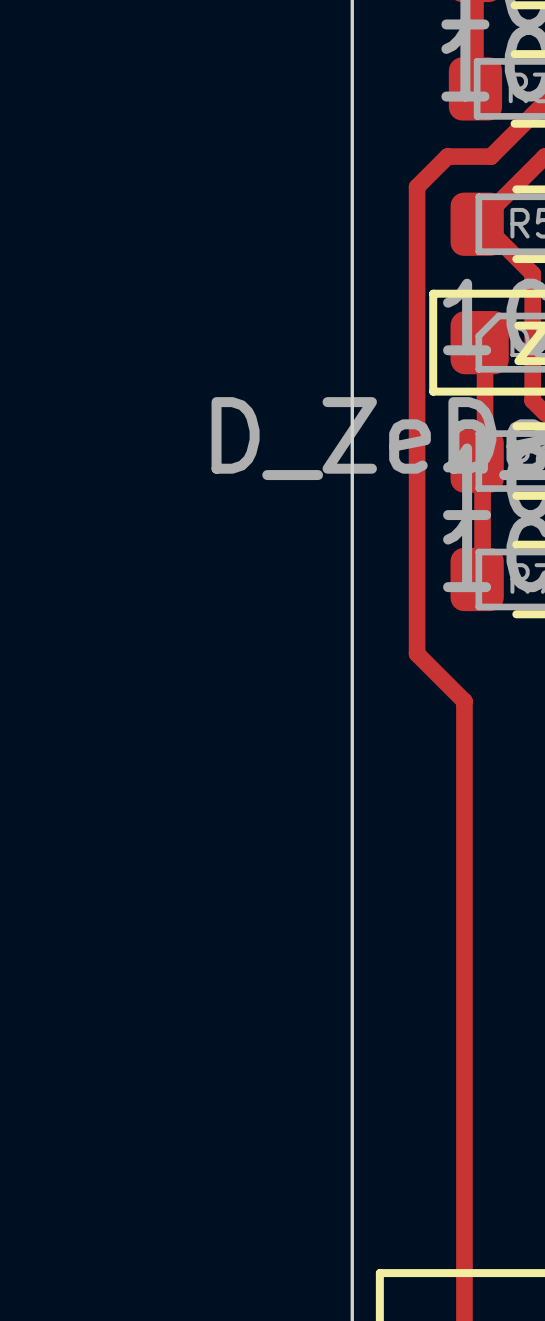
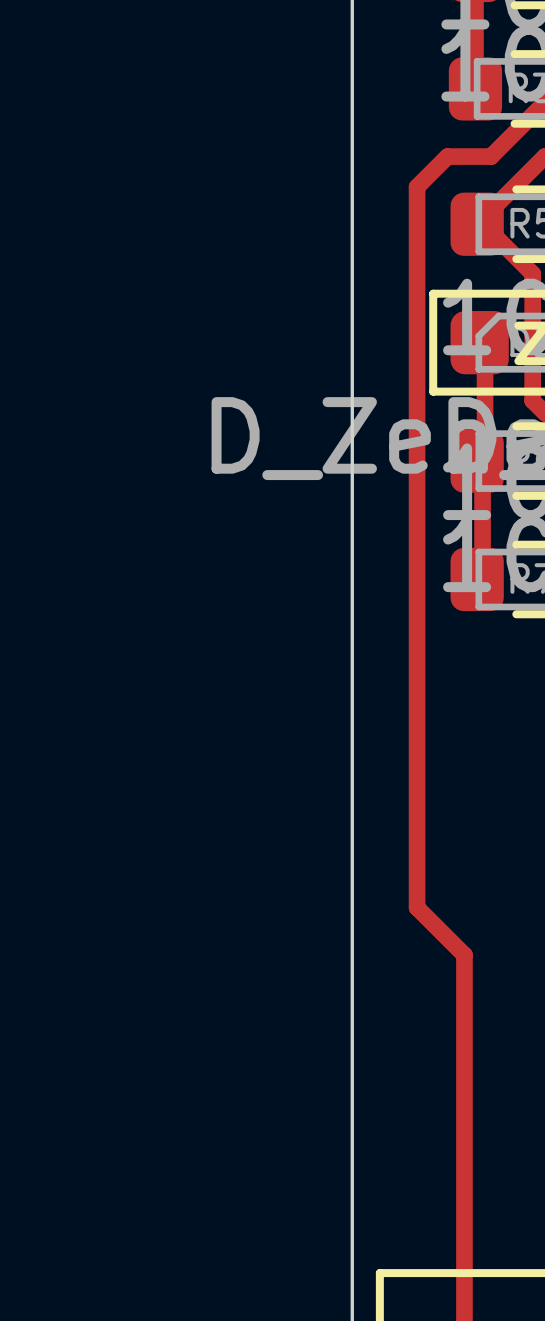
track: (417, 653) (464, 701) (464, 955) -> (417, 653) (417, 907) (464, 955)

